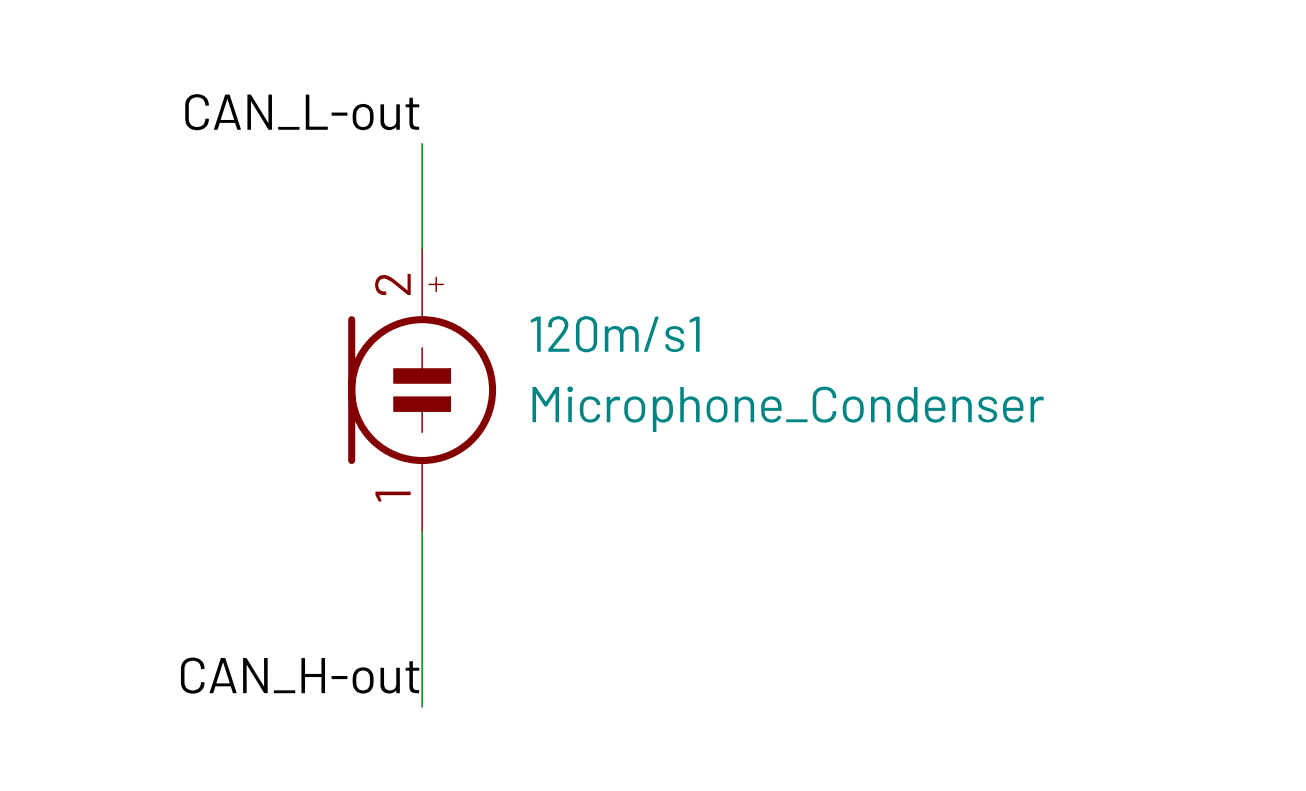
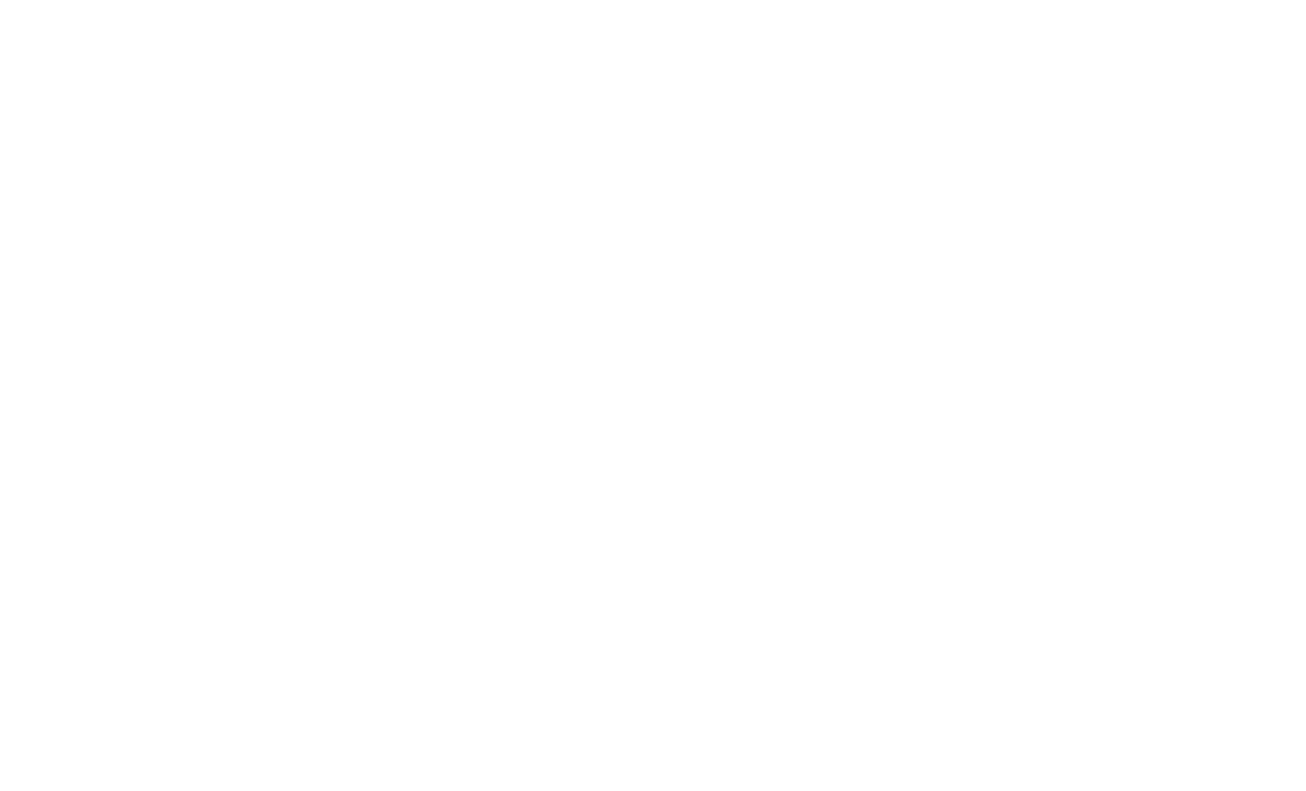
label: CAN_L-out (302, 112) -> none
wire: (422, 143) (422, 249) -> none
120m/s1: Microphone_Condenser (422, 390) -> none
wire: (422, 530) (422, 707) -> none
label: CAN_H-out (300, 675) -> none

